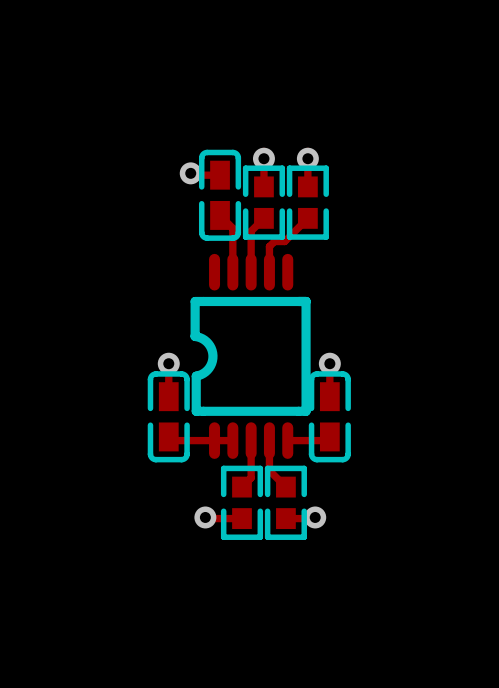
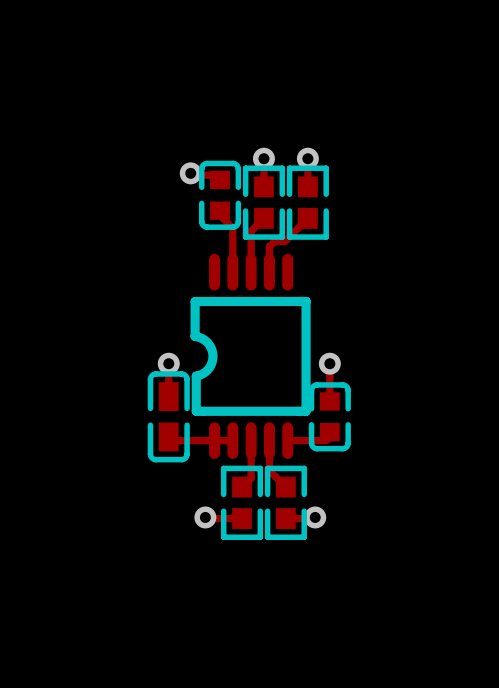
part footprint: [198, 149, 242, 241] -> [198, 160, 242, 230]
part footprint: [308, 371, 351, 463] -> [308, 382, 351, 452]

